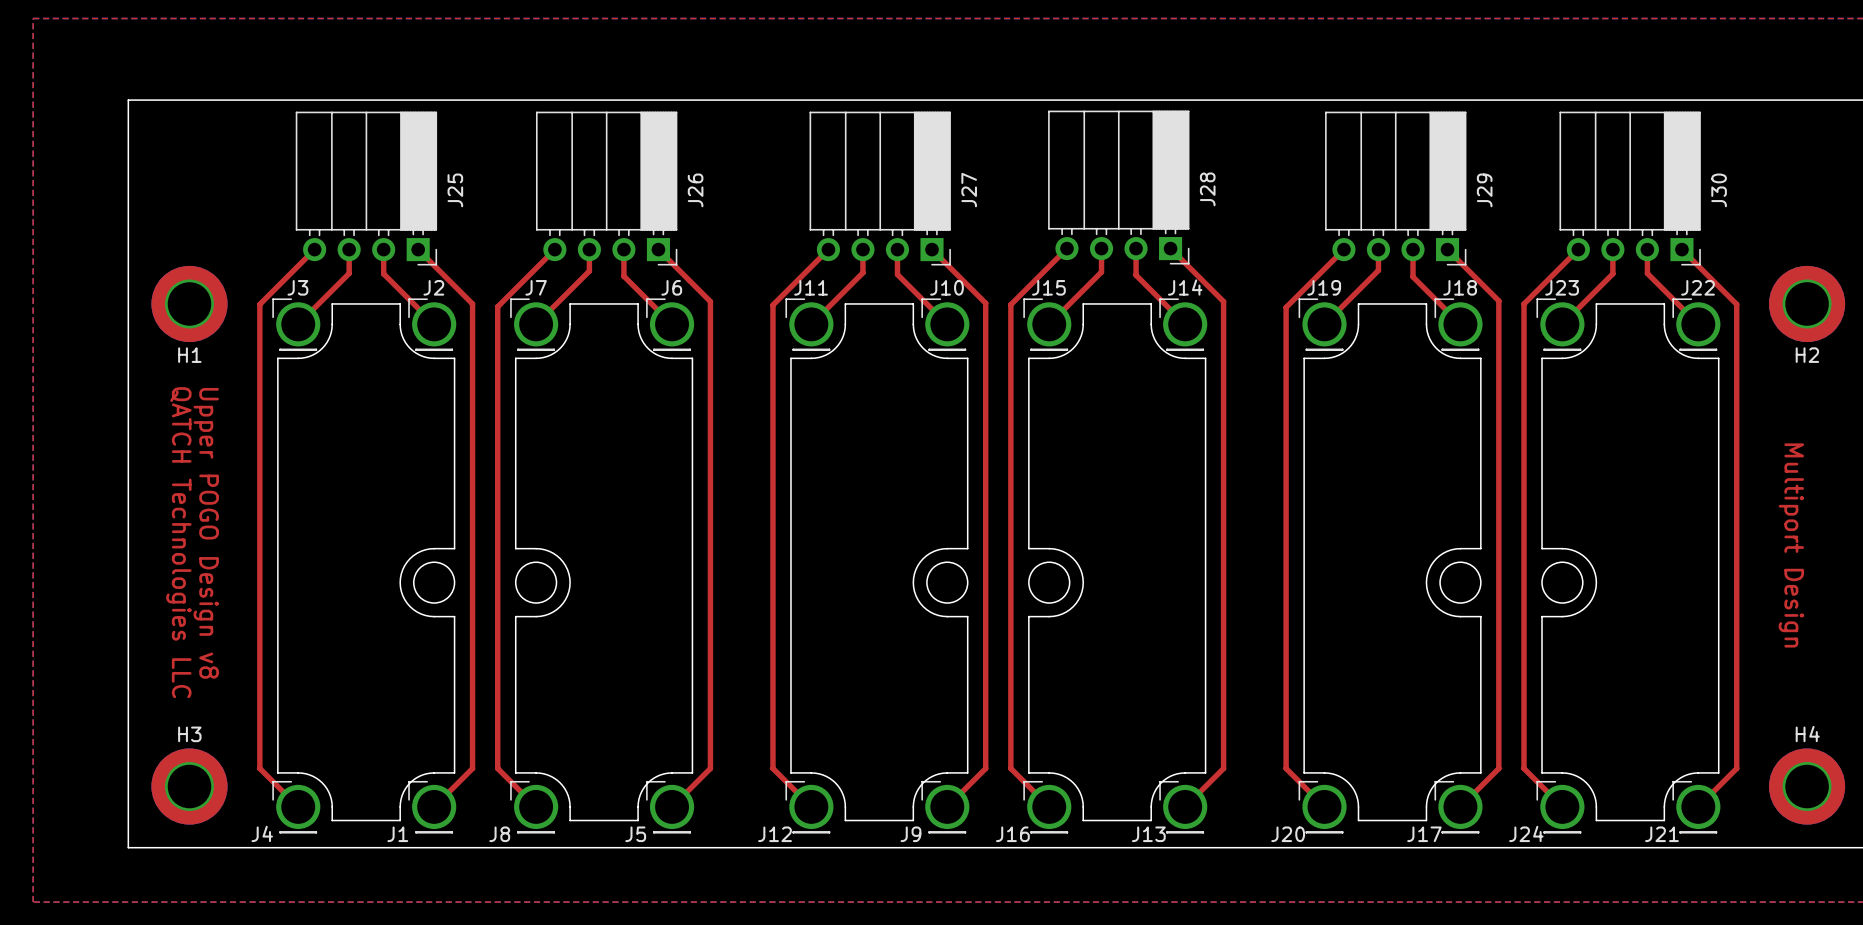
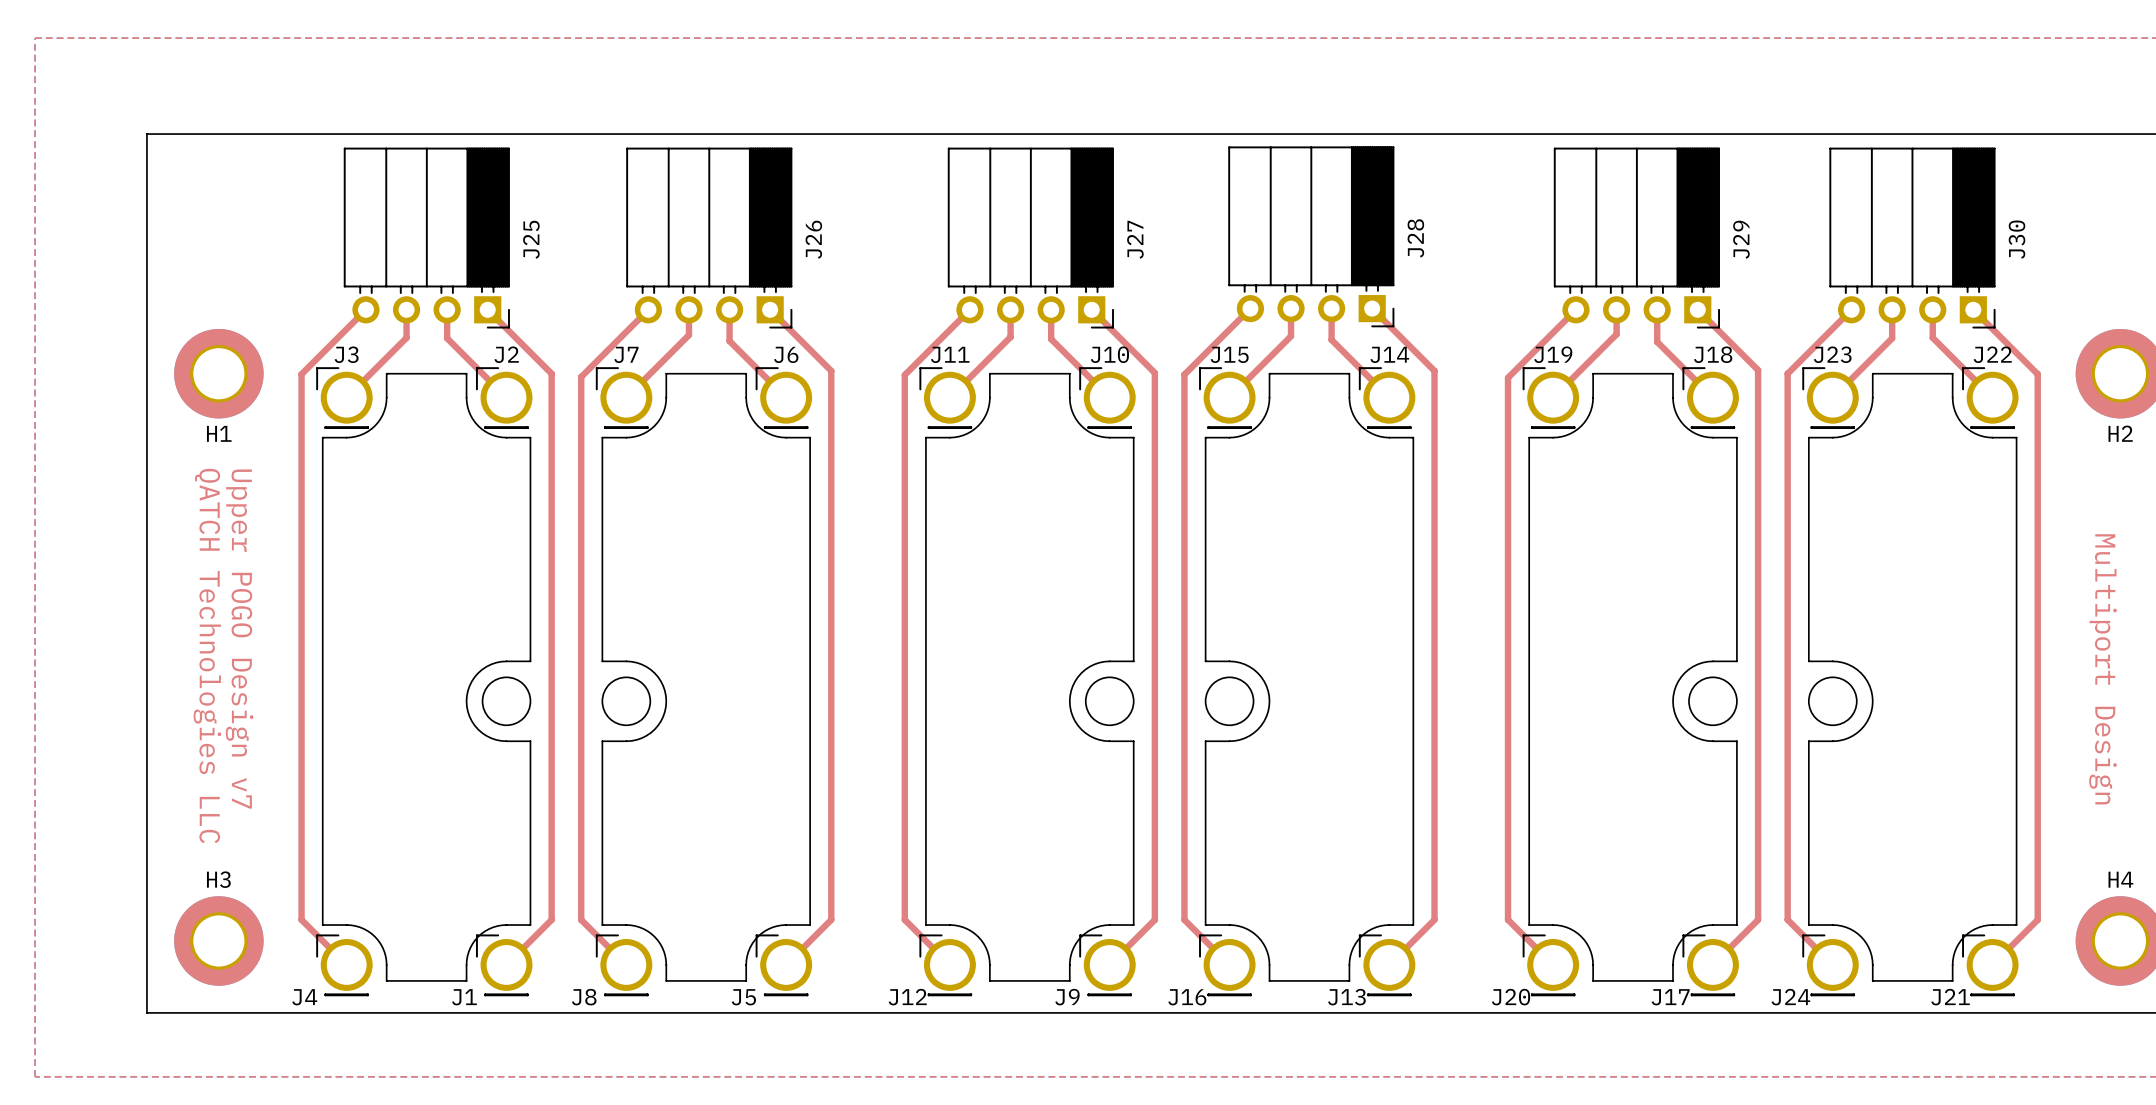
text: Upper POGO Design v8 (206, 533) -> Upper POGO Design v7 (239, 639)

